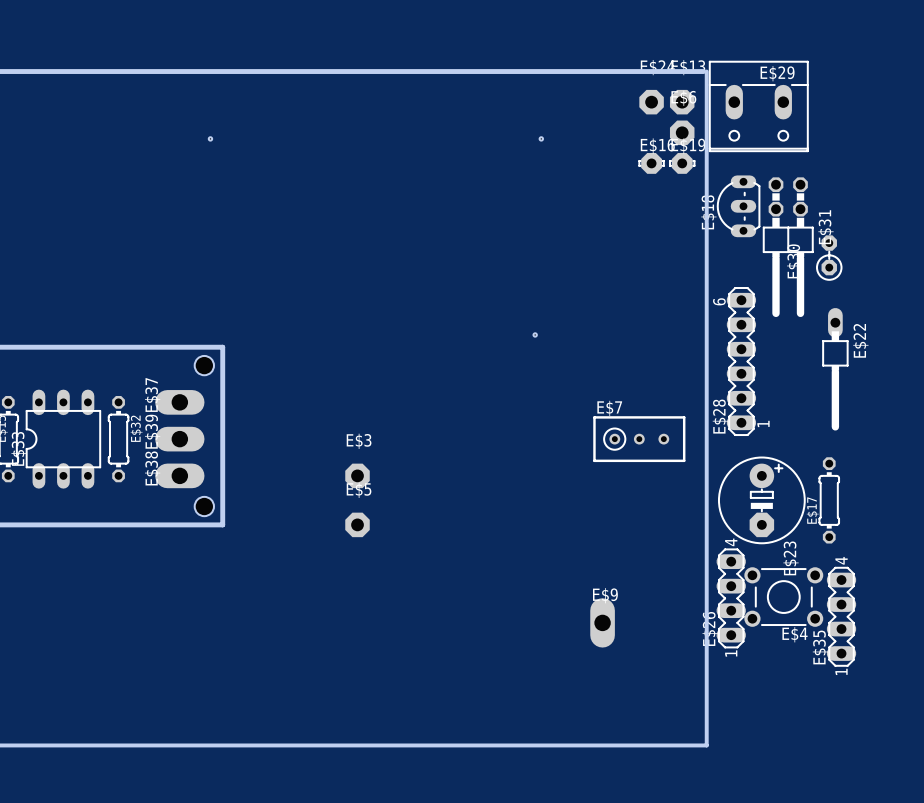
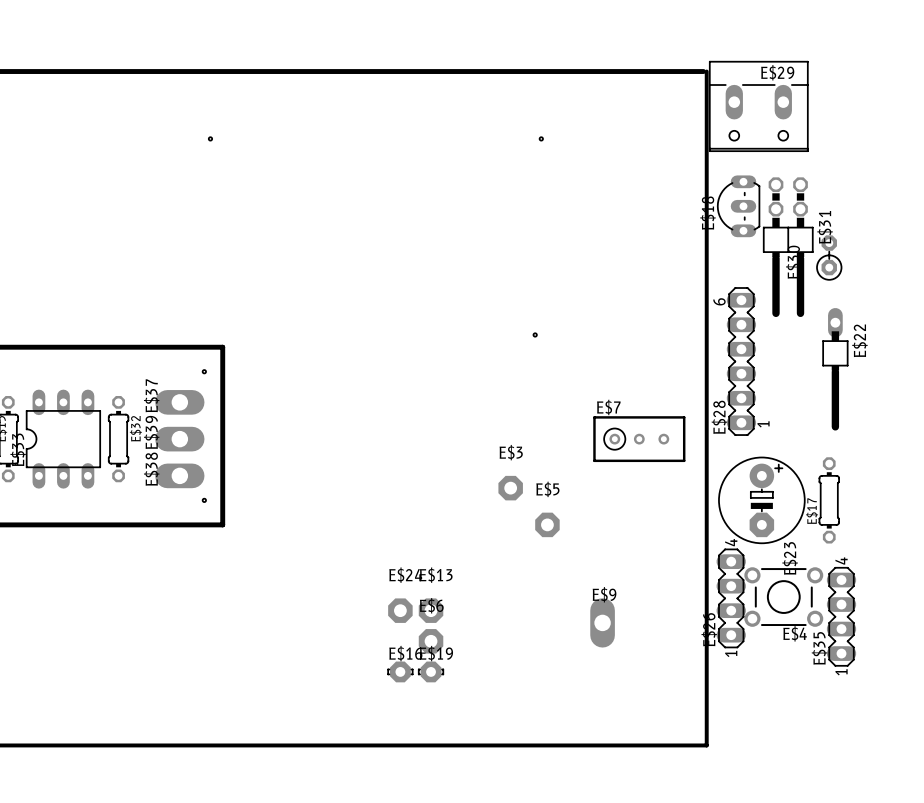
E$24 position: (651, 102) -> (400, 610)
E$13 position: (682, 102) -> (431, 610)
E$6 position: (682, 132) -> (431, 641)
E$16 position: (651, 163) -> (400, 671)
E$19 position: (682, 163) -> (431, 671)
hole size: [194, 355, 214, 376] -> [202, 370, 207, 374]
E$3 position: (357, 475) -> (510, 488)
hole size: [194, 496, 214, 517] -> [202, 498, 207, 503]
E$5 position: (357, 524) -> (547, 524)

